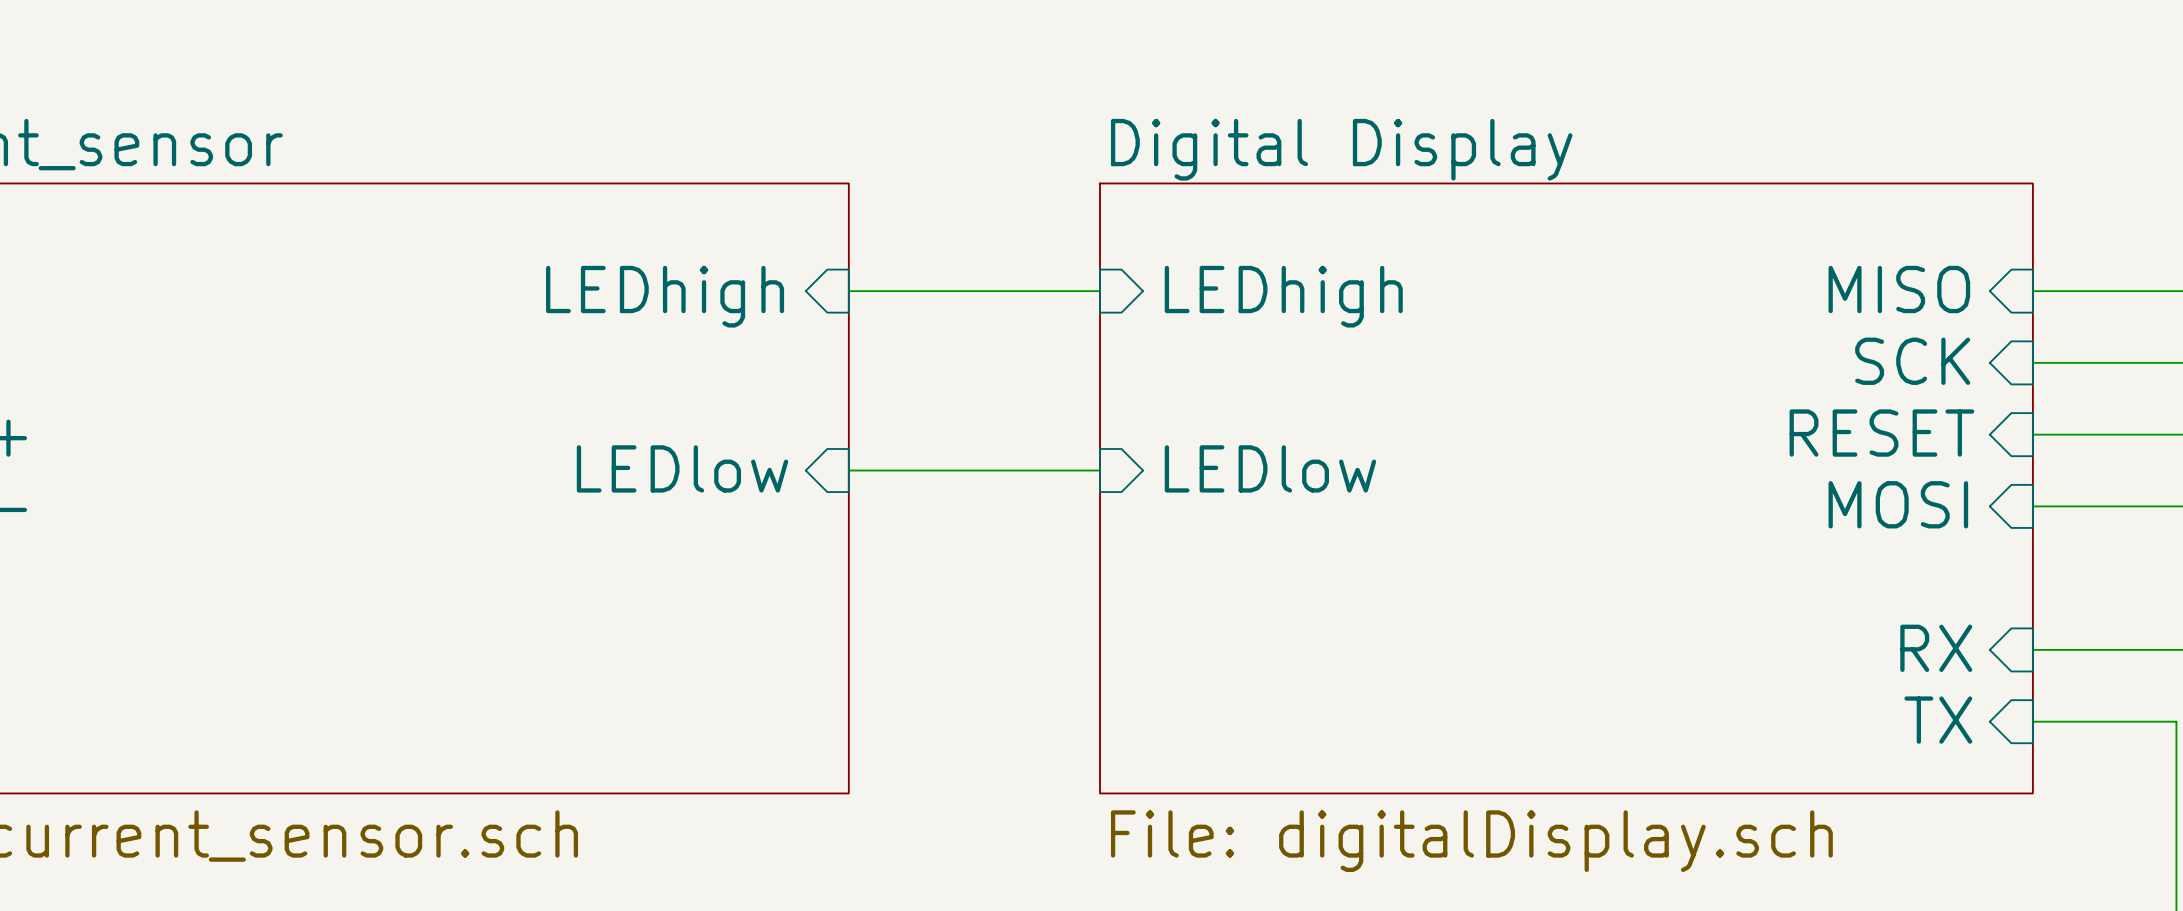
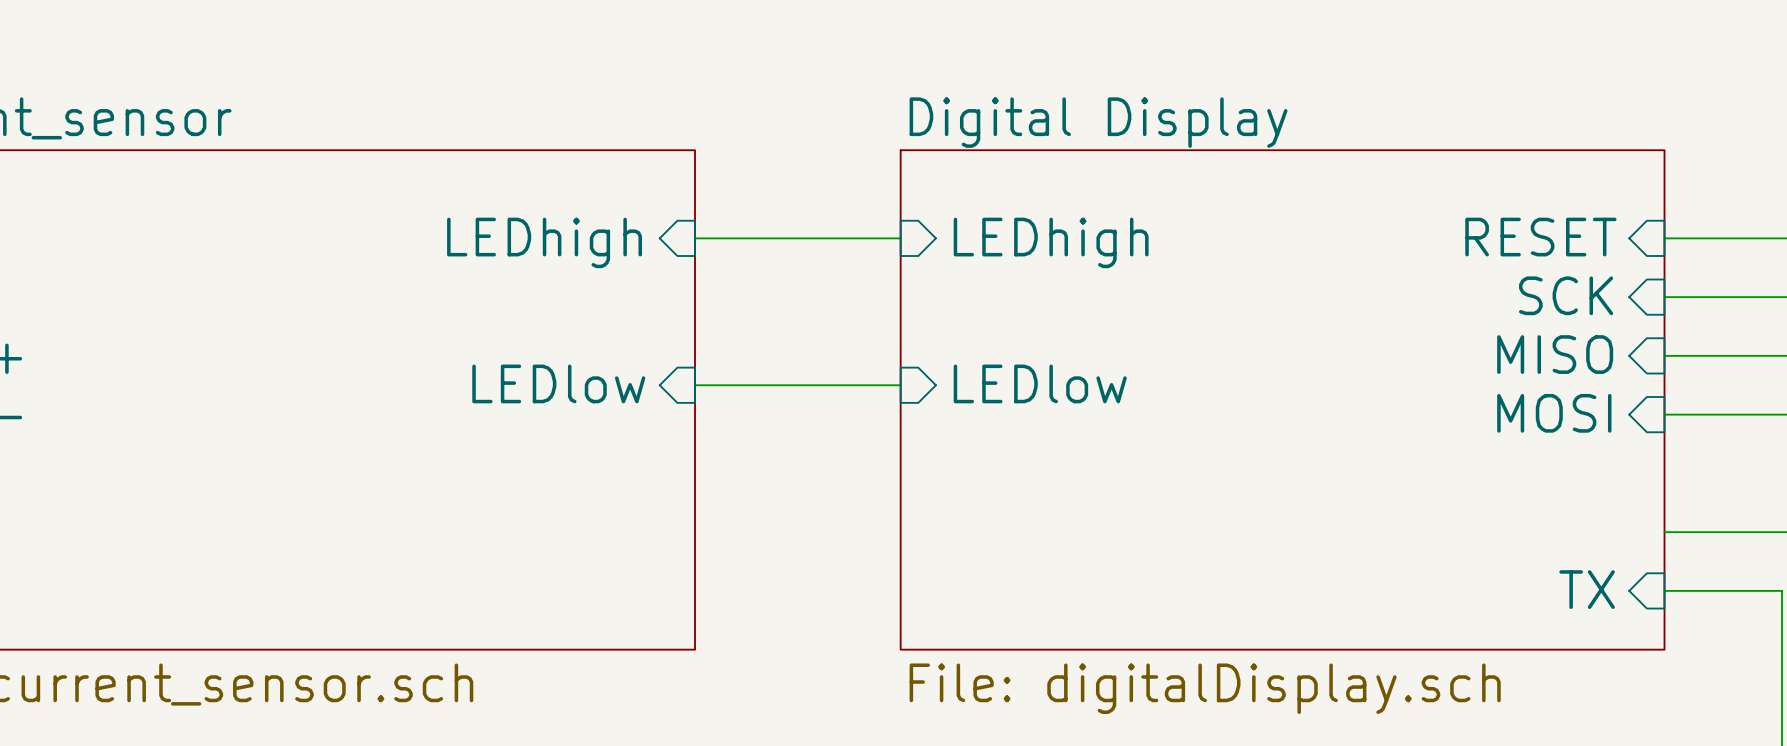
sheet pin: MISO (1899, 289) -> RESET (1540, 237)
sheet pin: RESET (1881, 433) -> MISO (1555, 354)
sheet pin: RX (1936, 648) -> none

